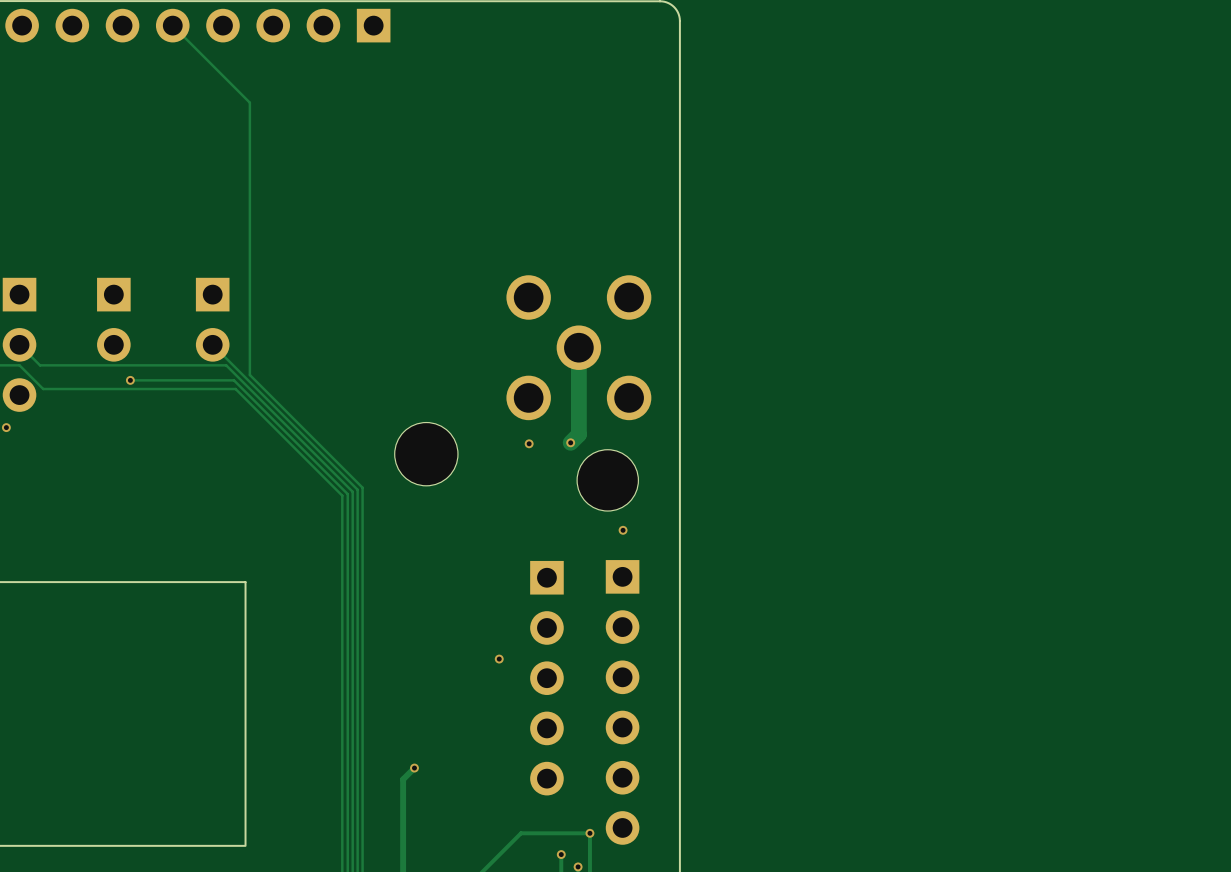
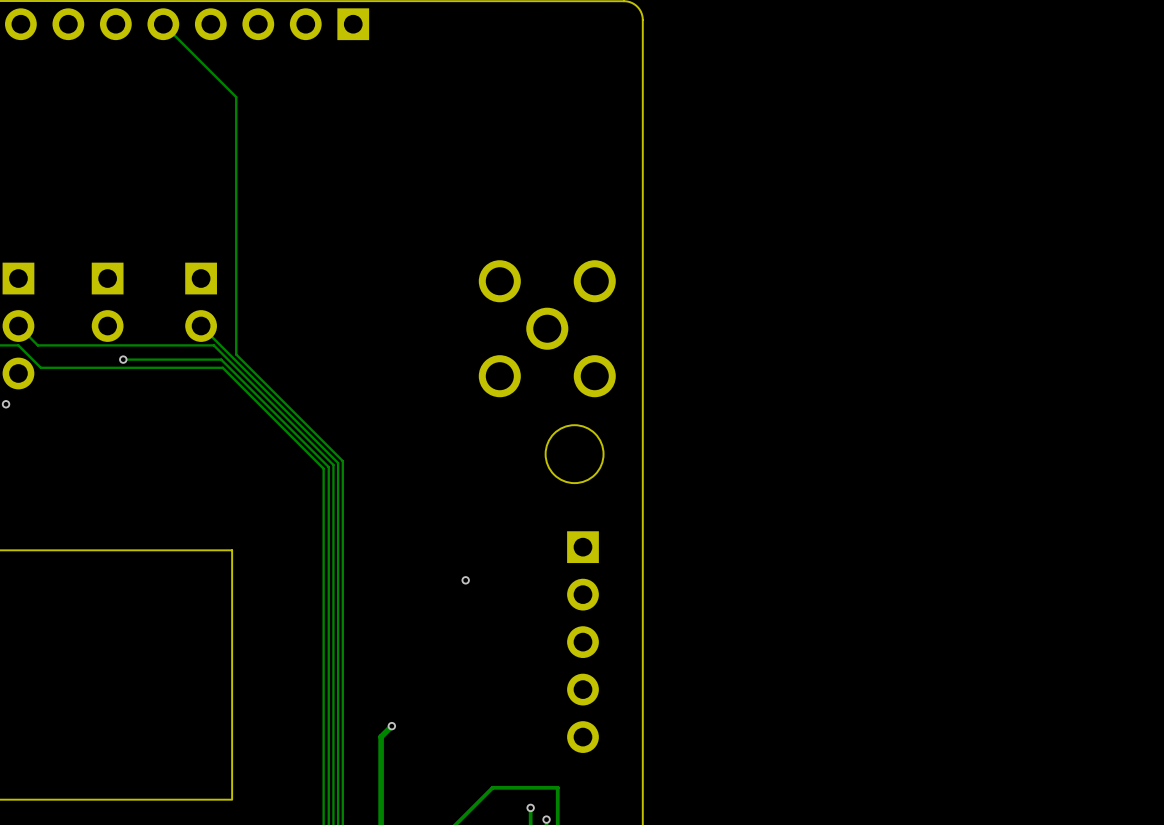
track: (578, 347) (578, 434) (570, 442) -> none
via: (570, 442) -> none
via: (529, 443) -> none
part: (426, 454) -> none
via: (623, 530) -> none
via position: (499, 659) -> (465, 580)
part position: (546, 678) -> (582, 642)
part: (622, 702) -> none
via: (589, 833) -> none

